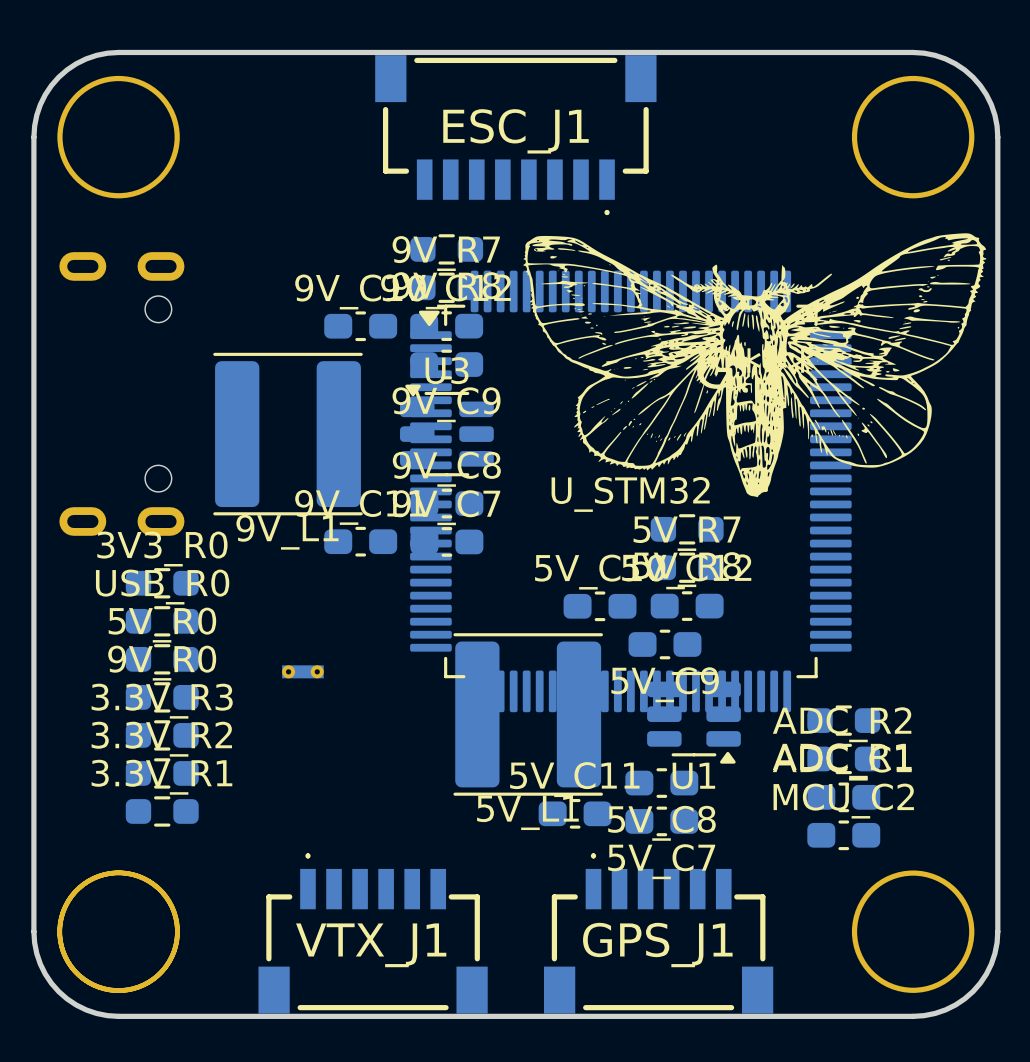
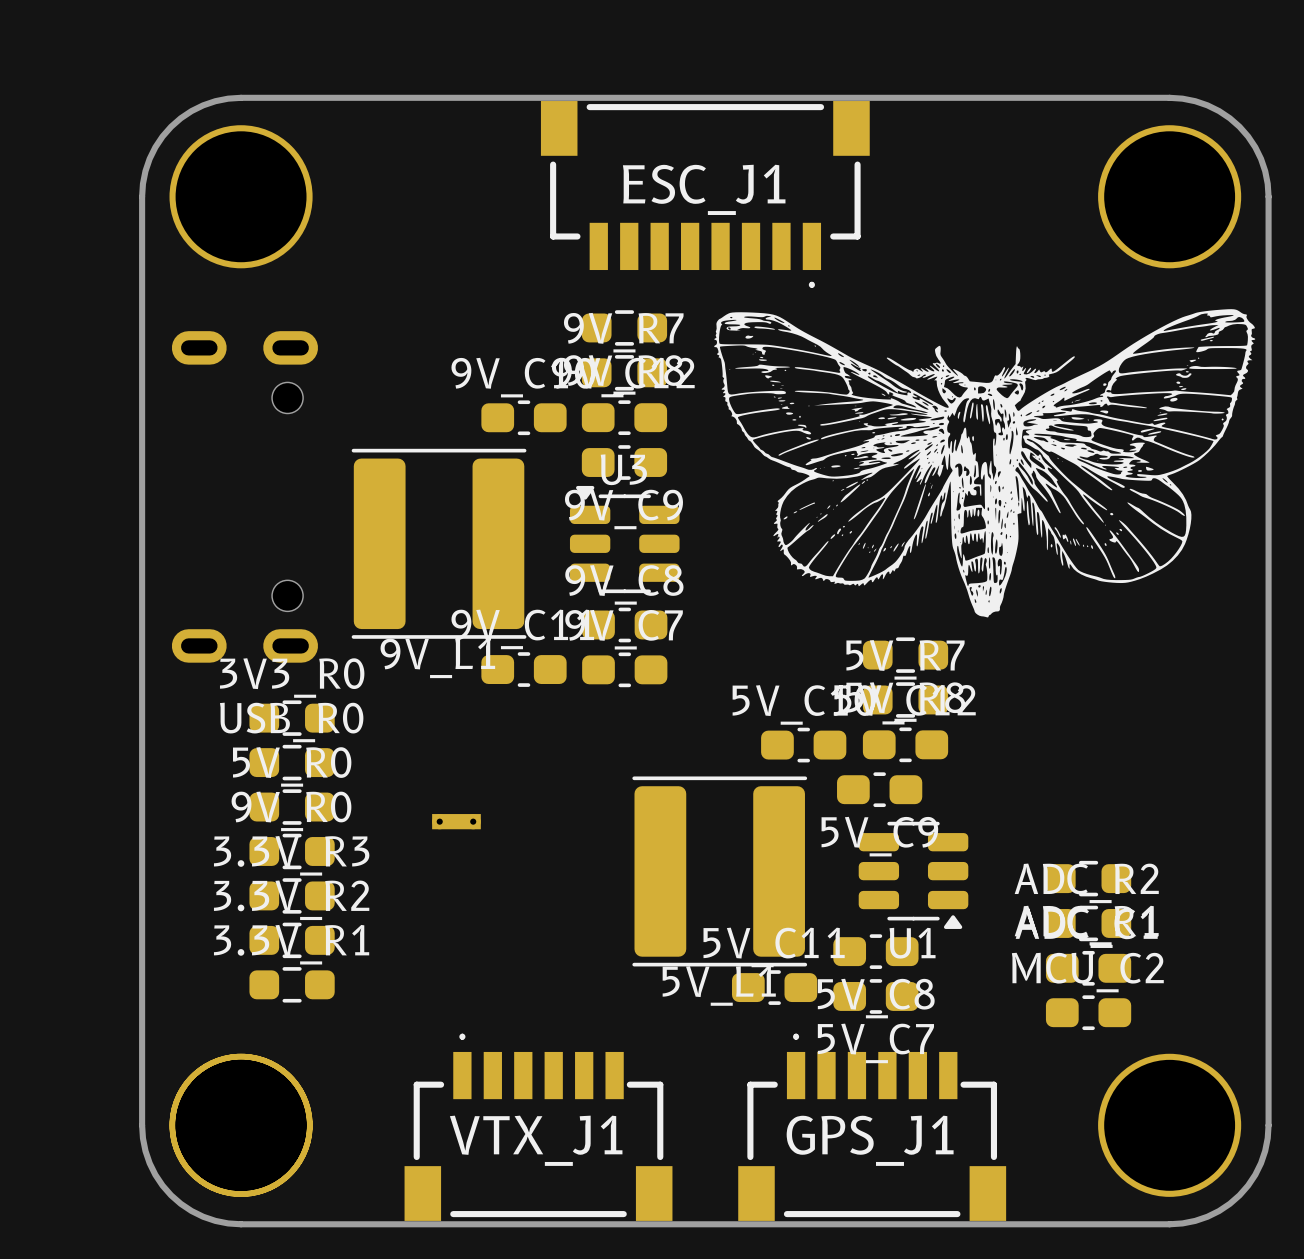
drawing: none -> [714, 309, 1256, 618]
part: (754, 365) -> none
U_STM32: (630, 491) -> none

